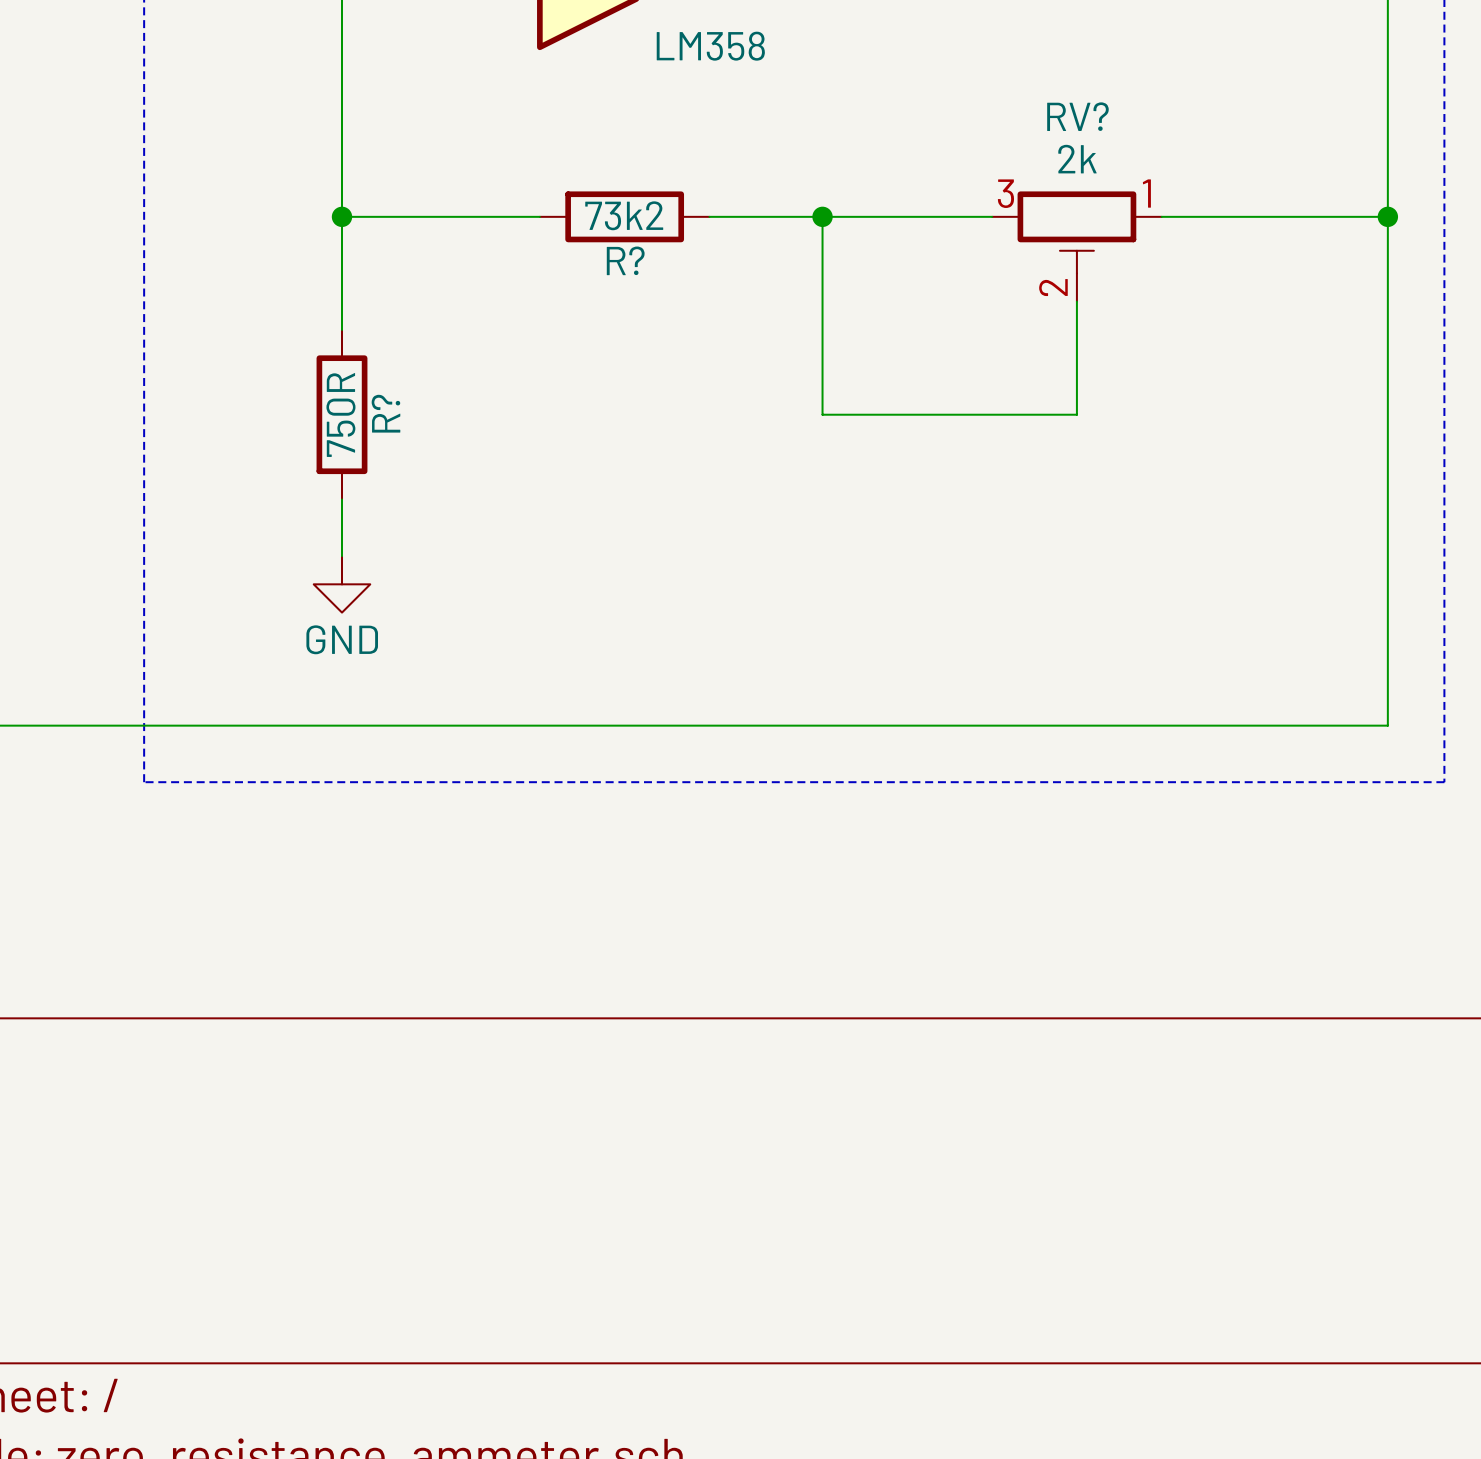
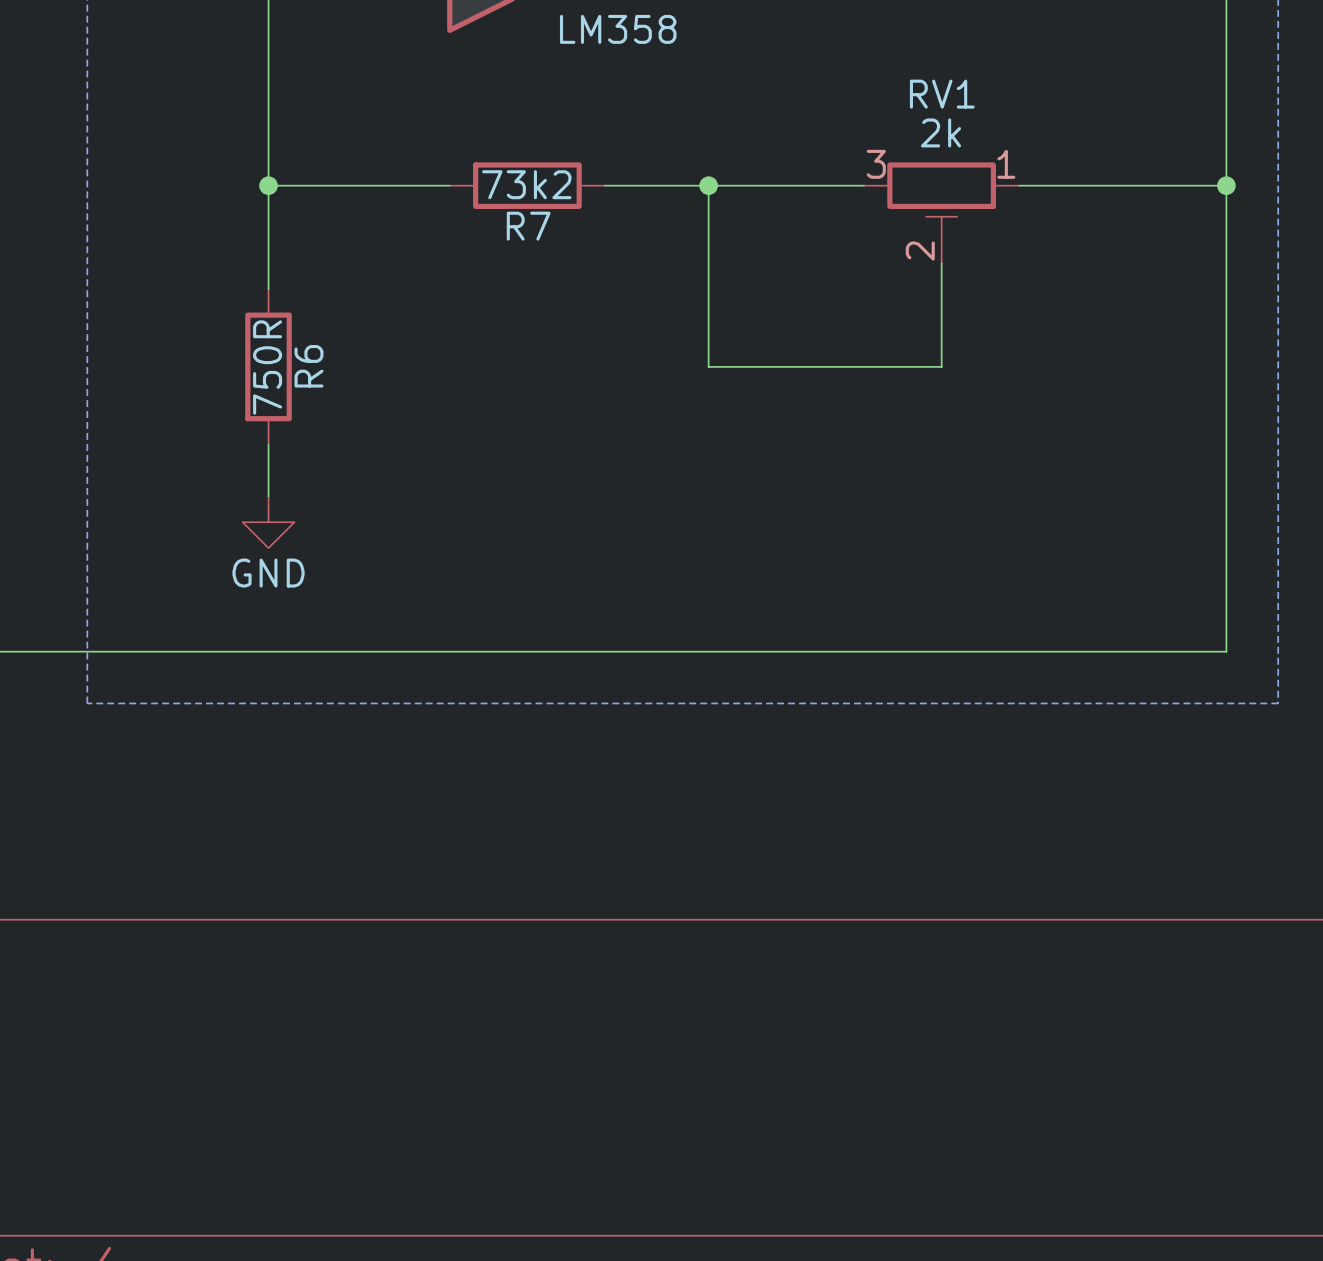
RV? name: RV? (1077, 116) -> RV1 (942, 94)
R? name: R? (625, 260) -> R7 (528, 226)
R? name: R? (385, 413) -> R6 (308, 366)

